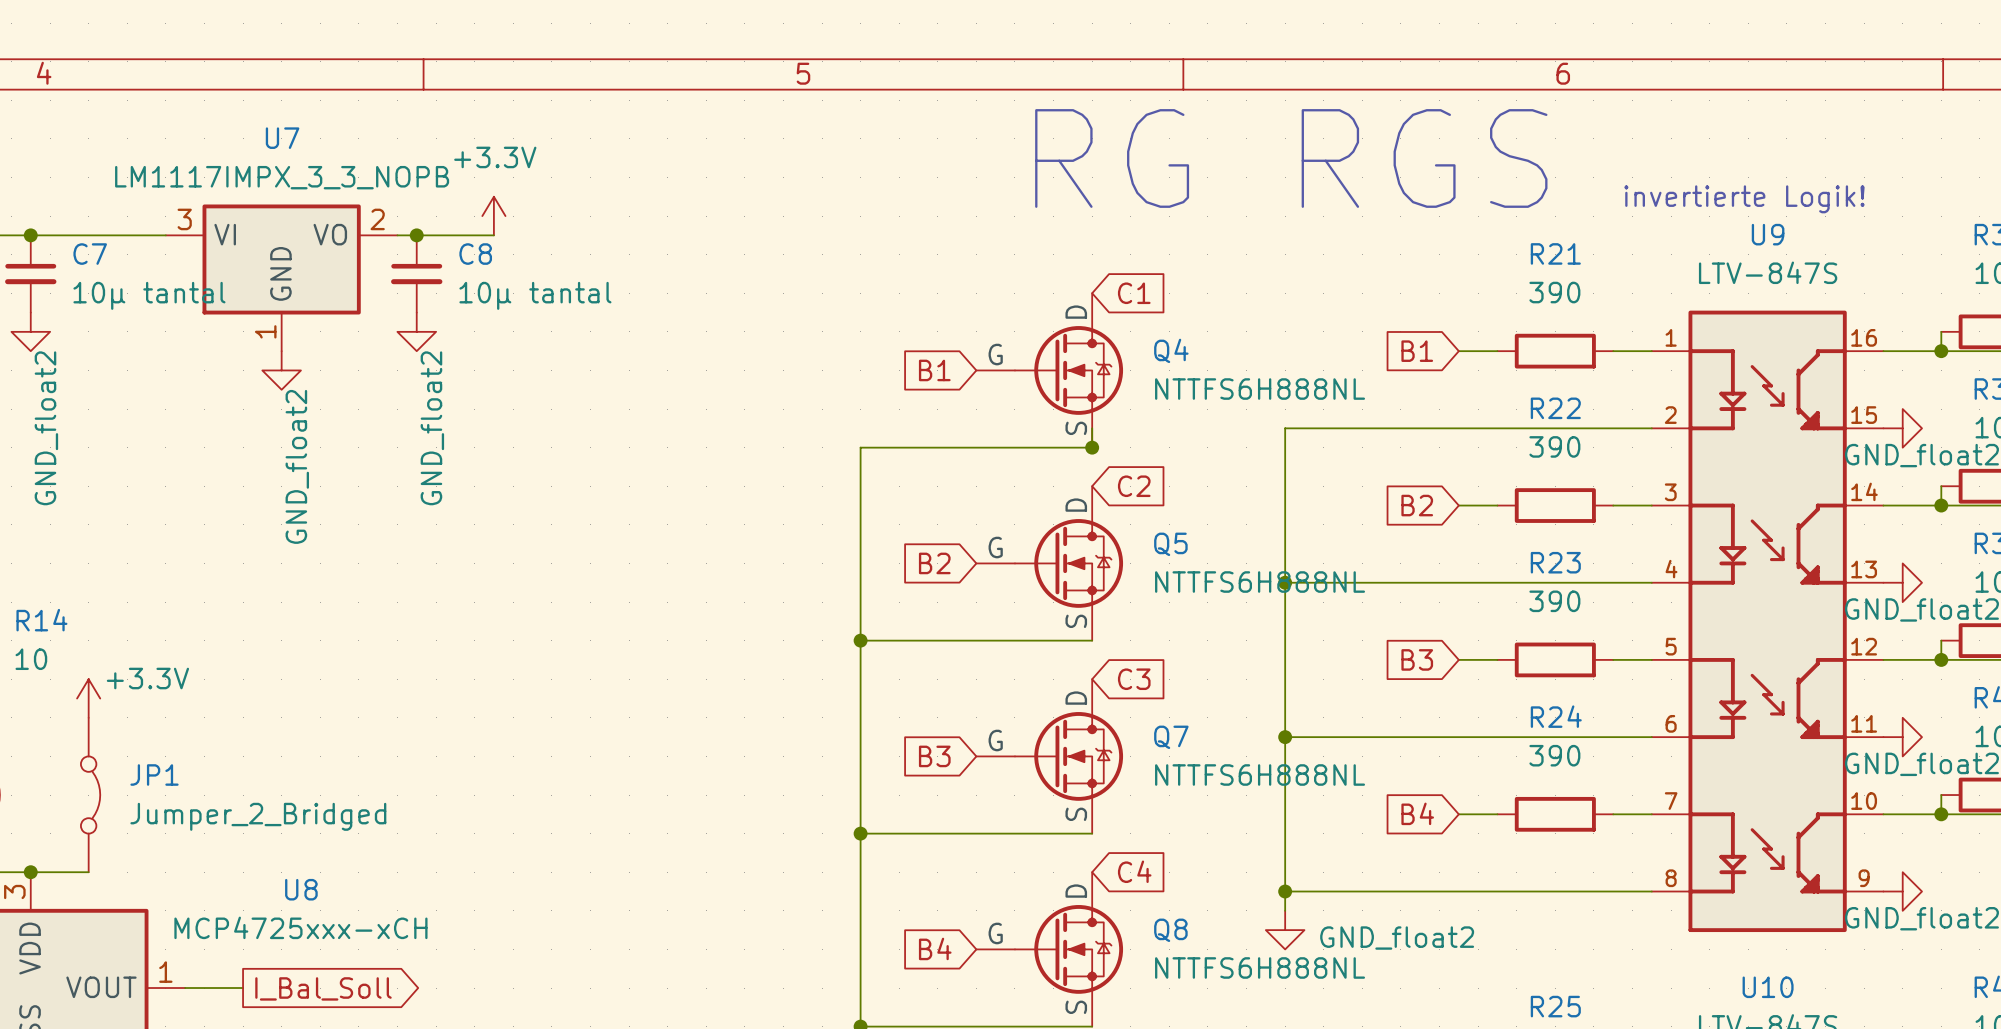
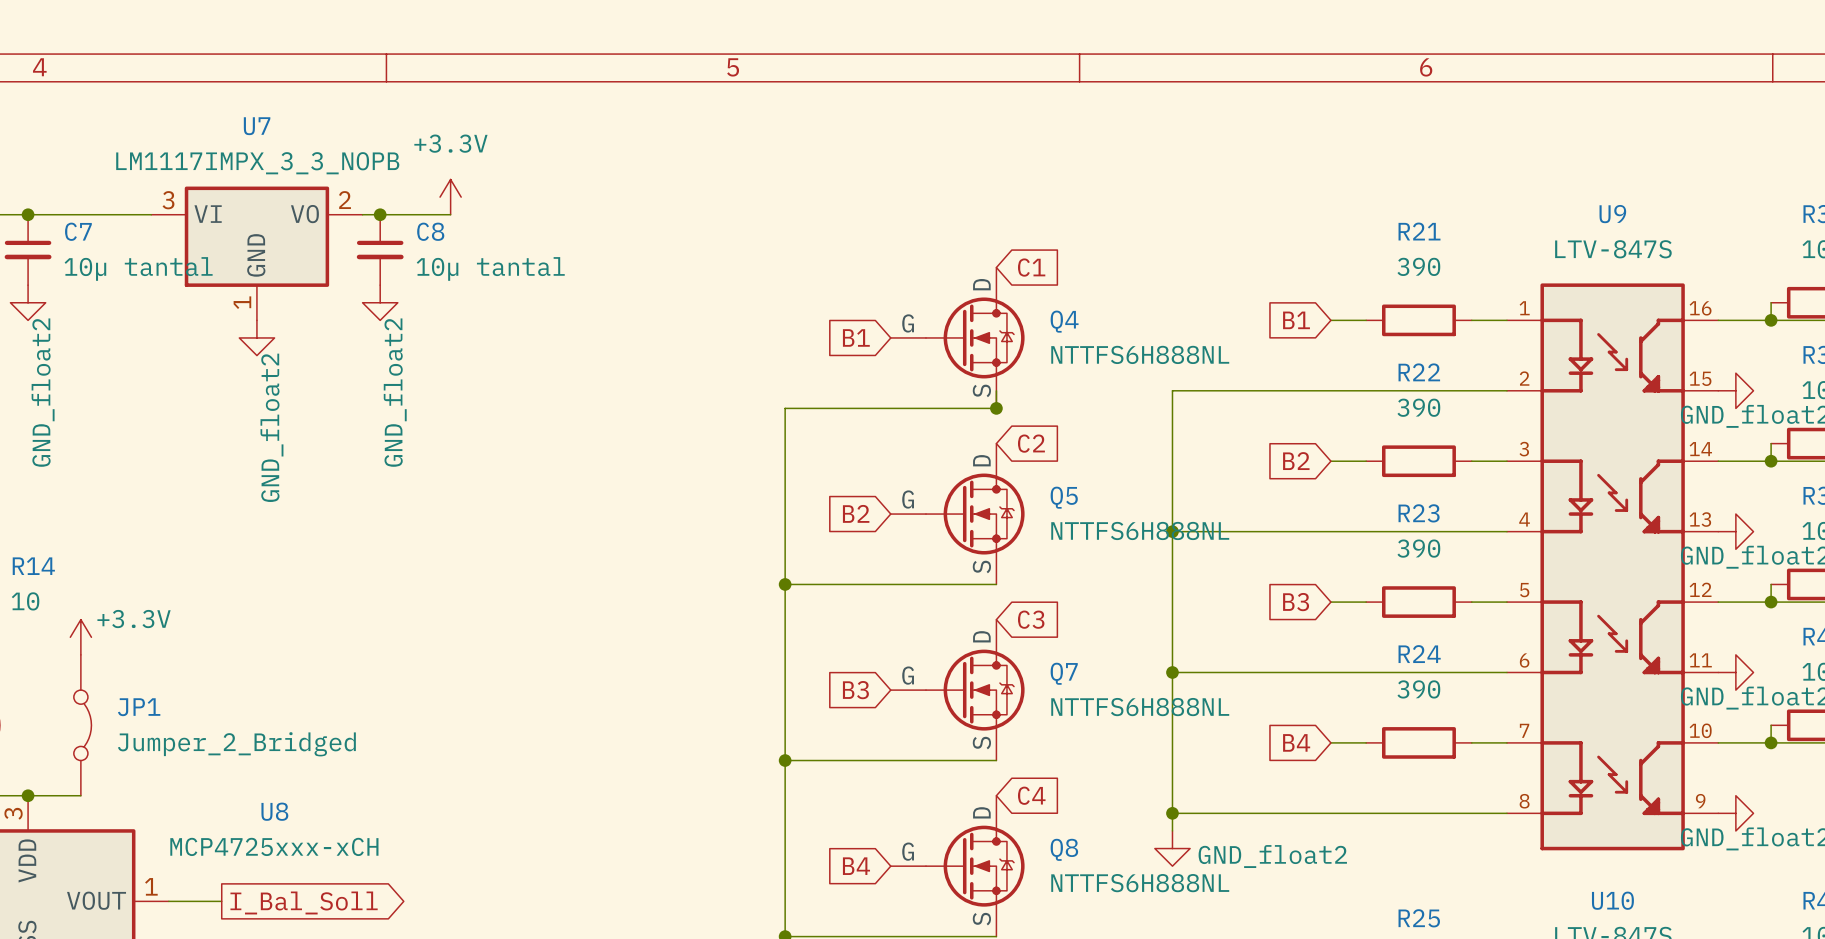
text: RG RGS (1291, 158) -> none
text: invertierte Logik! (1744, 199) -> none

